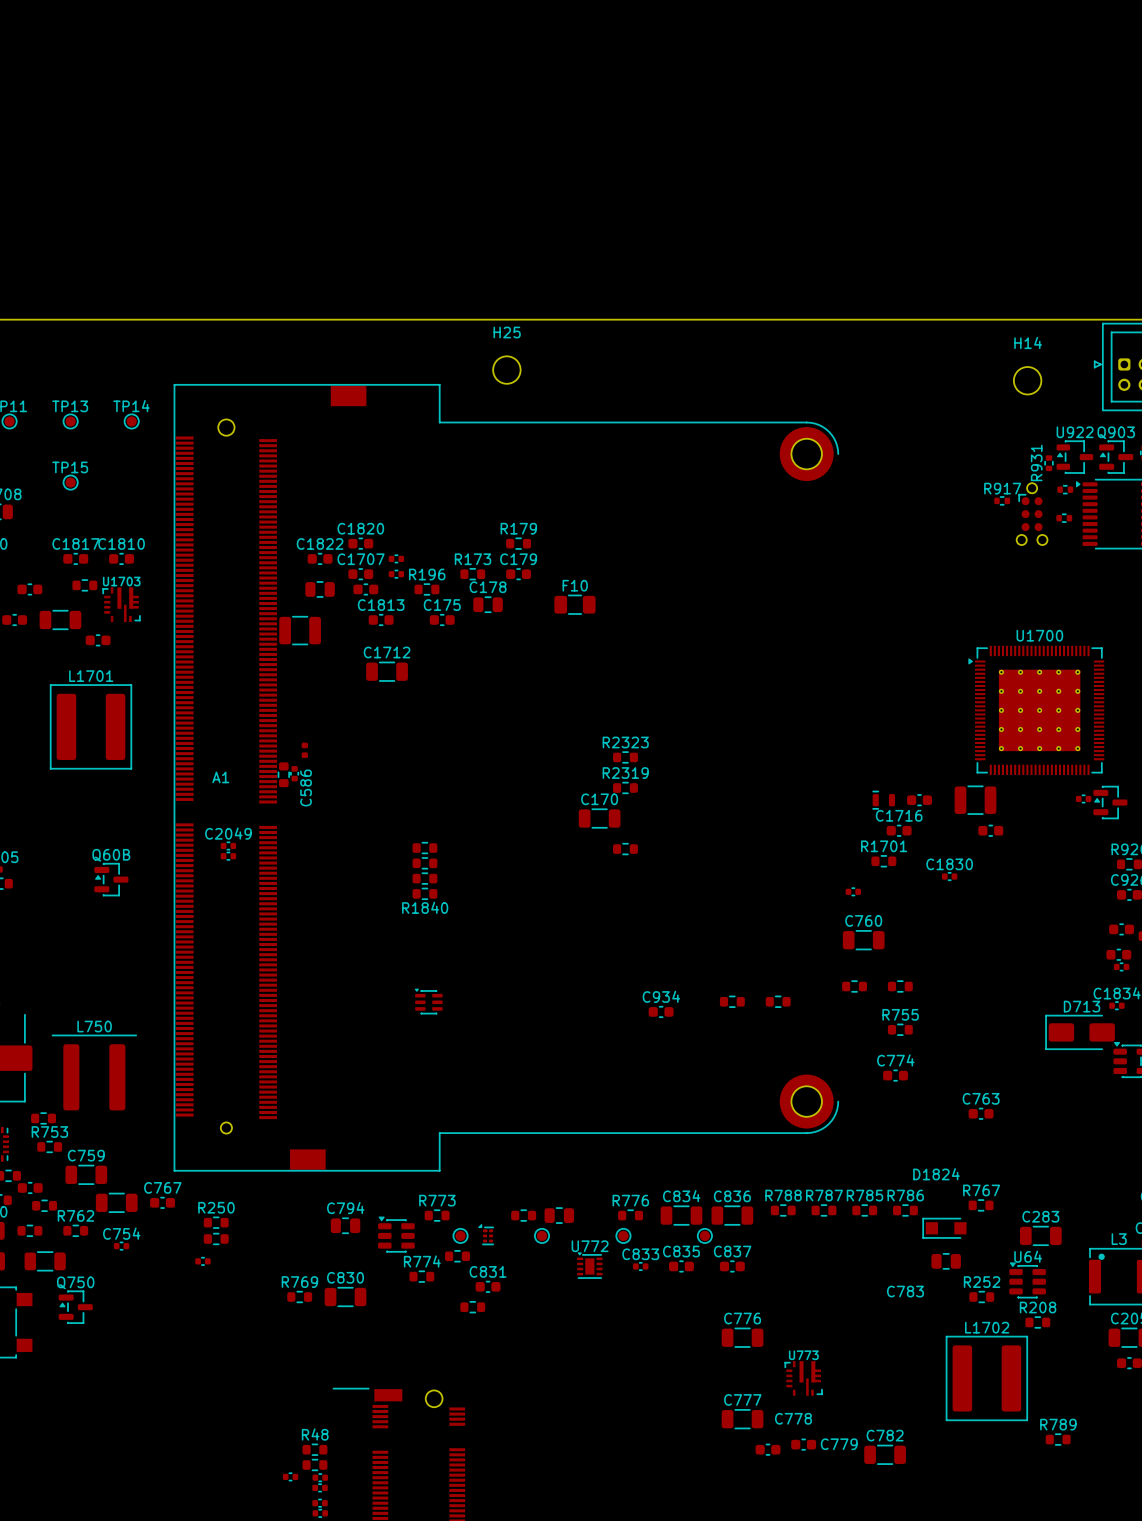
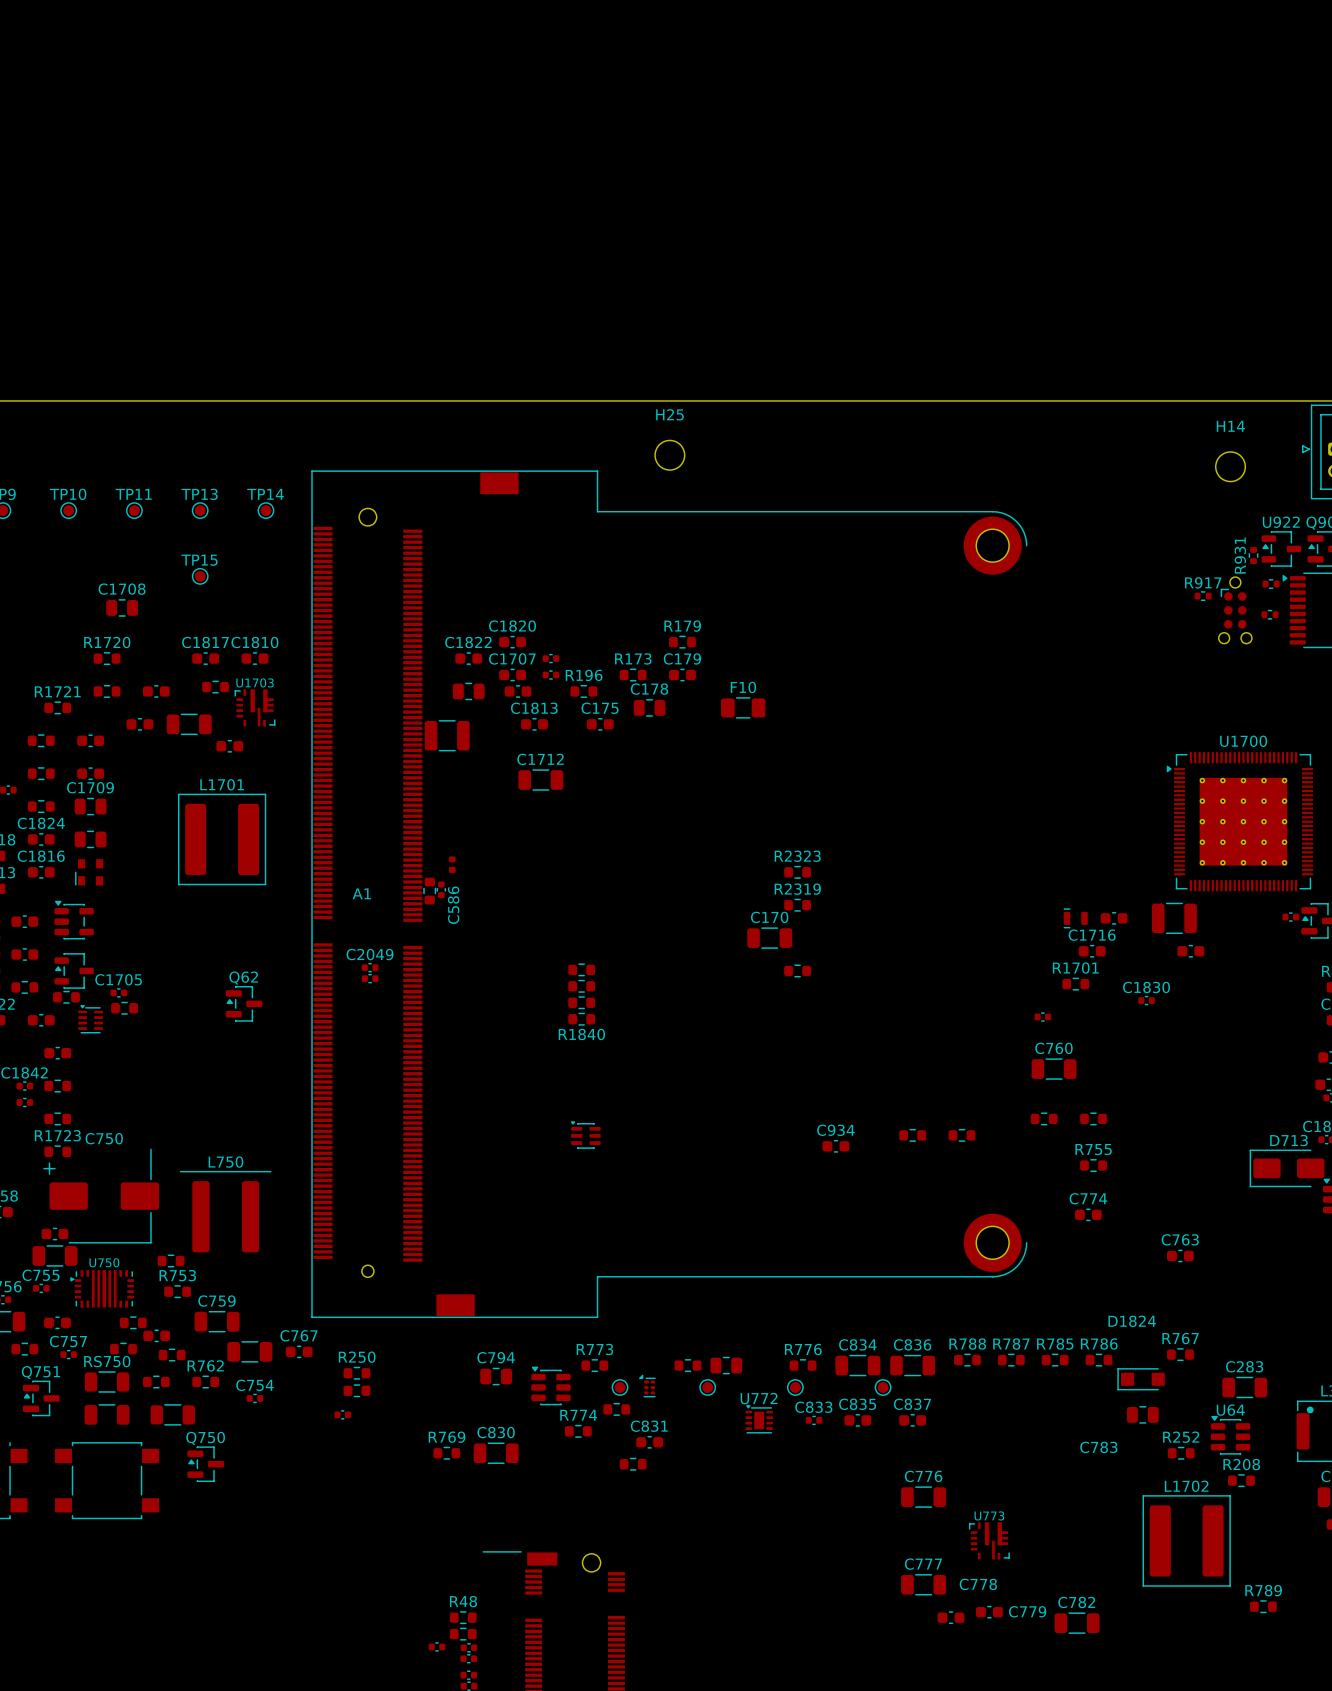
Q60B name: Q60B (111, 855) -> Q62 (243, 978)

